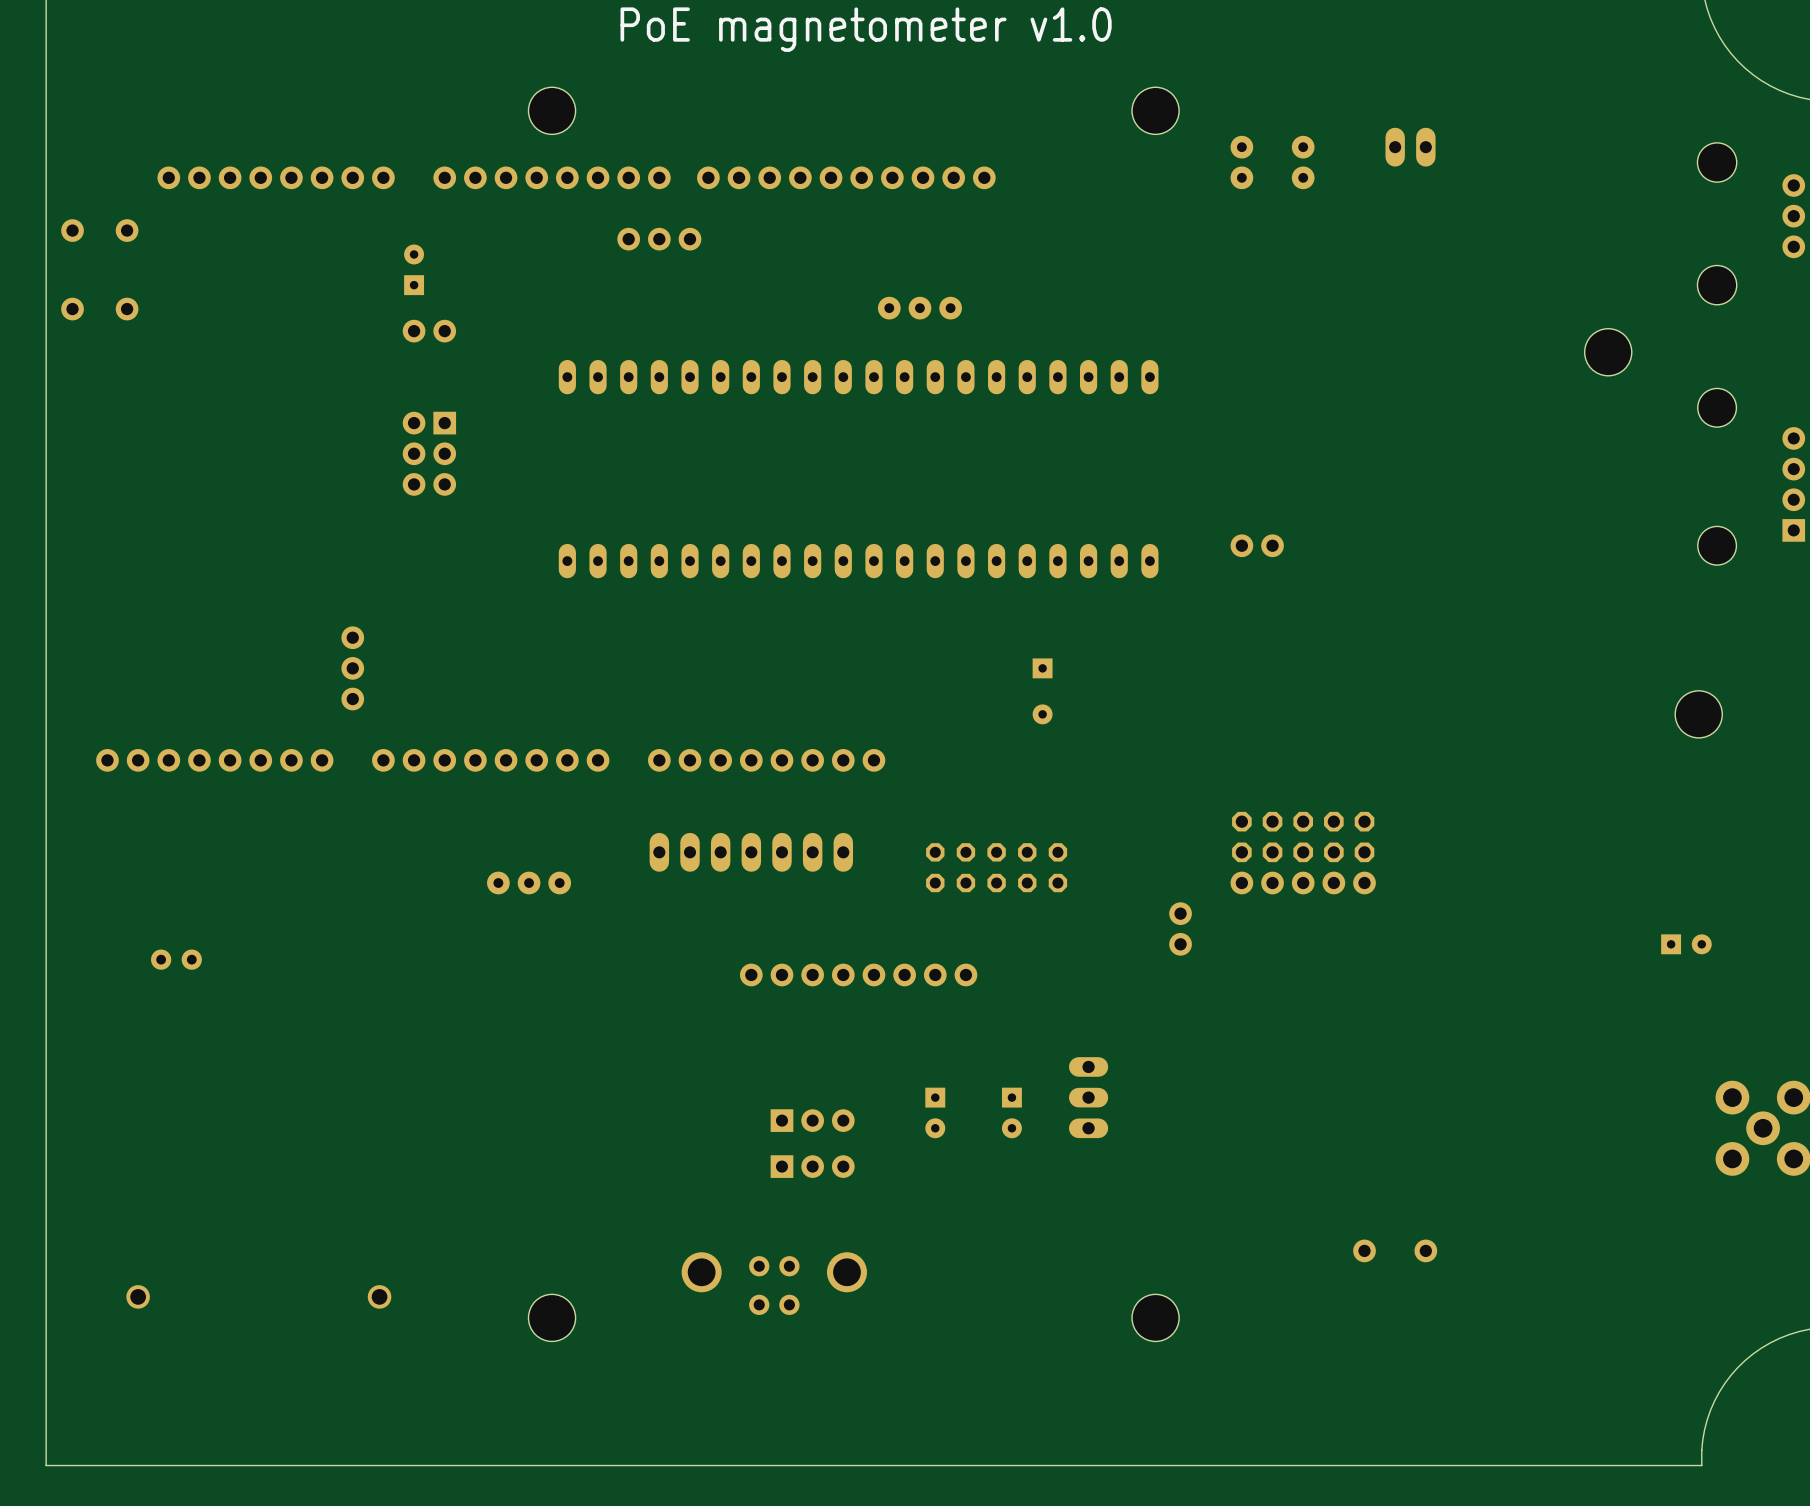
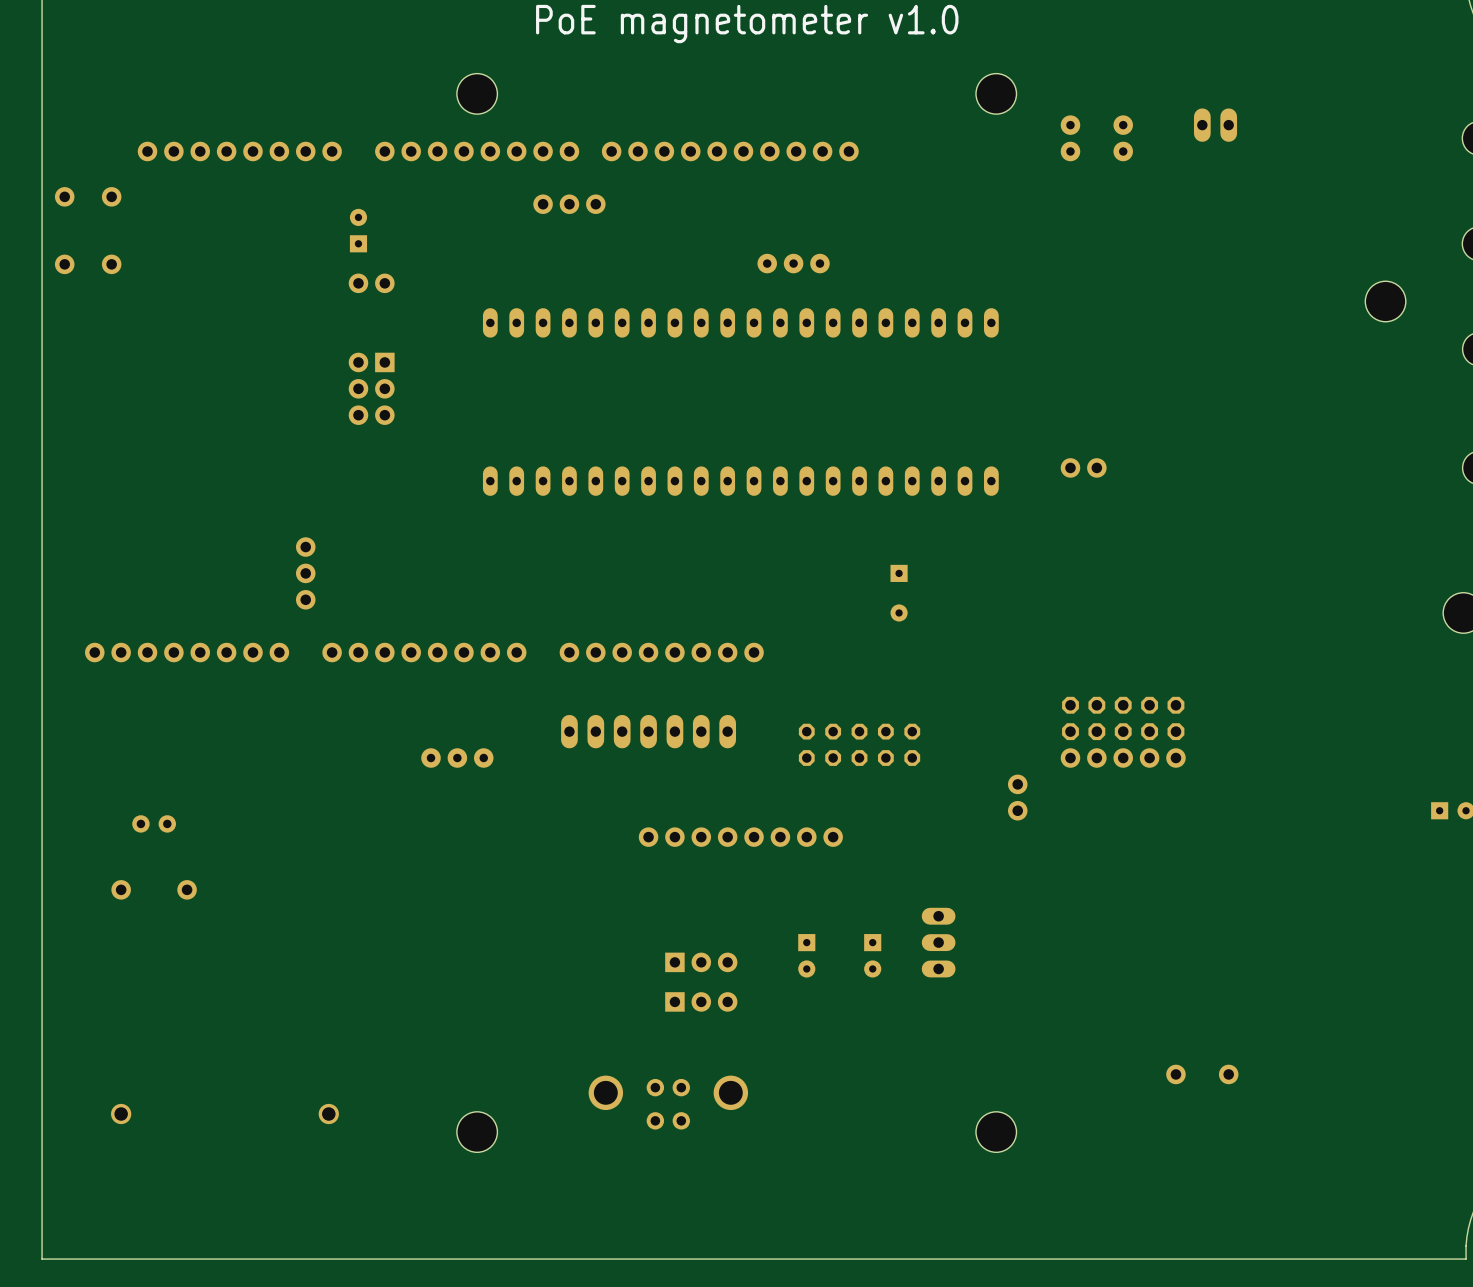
part: none -> (121, 889)
part: none -> (187, 889)

